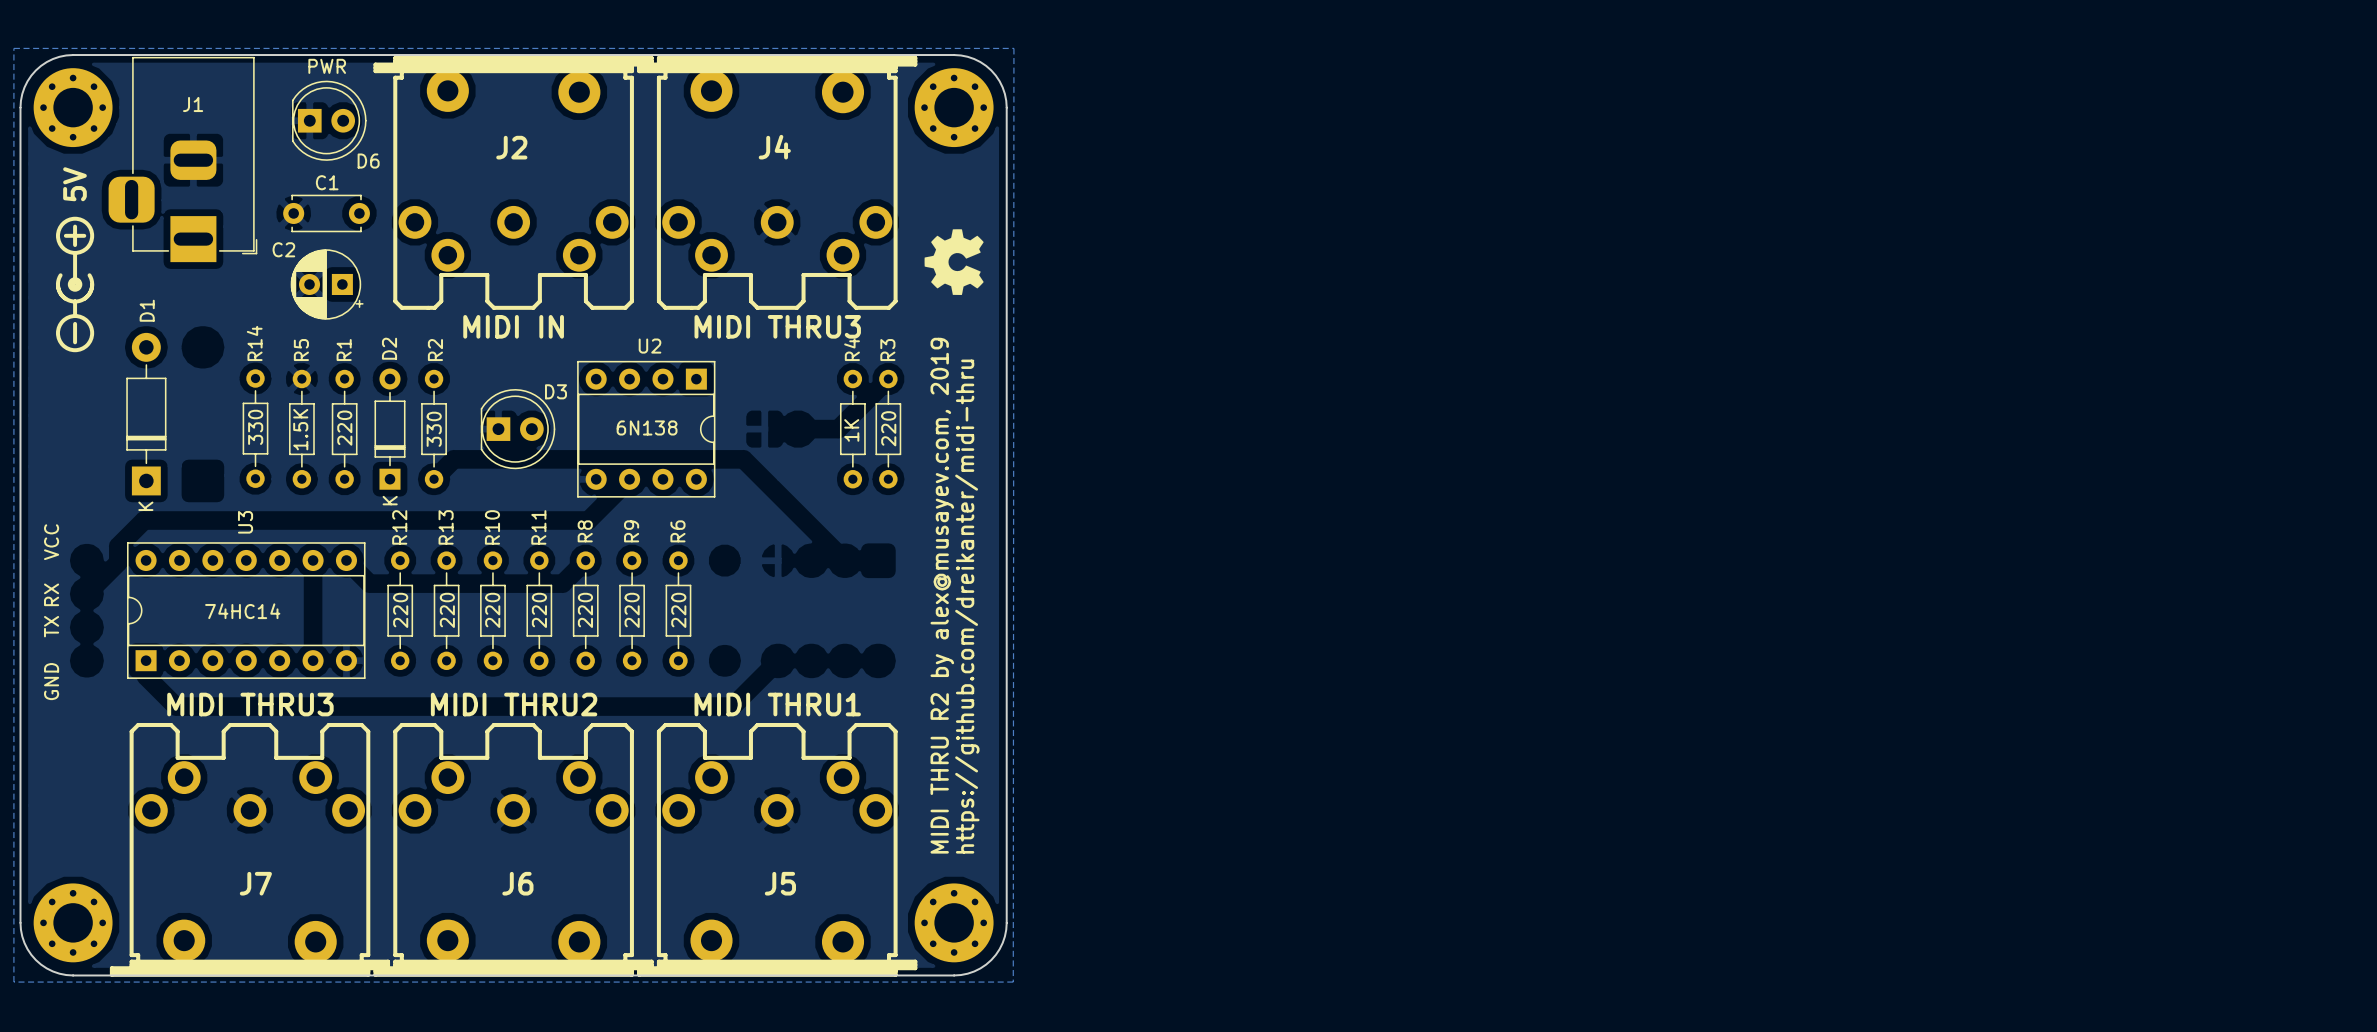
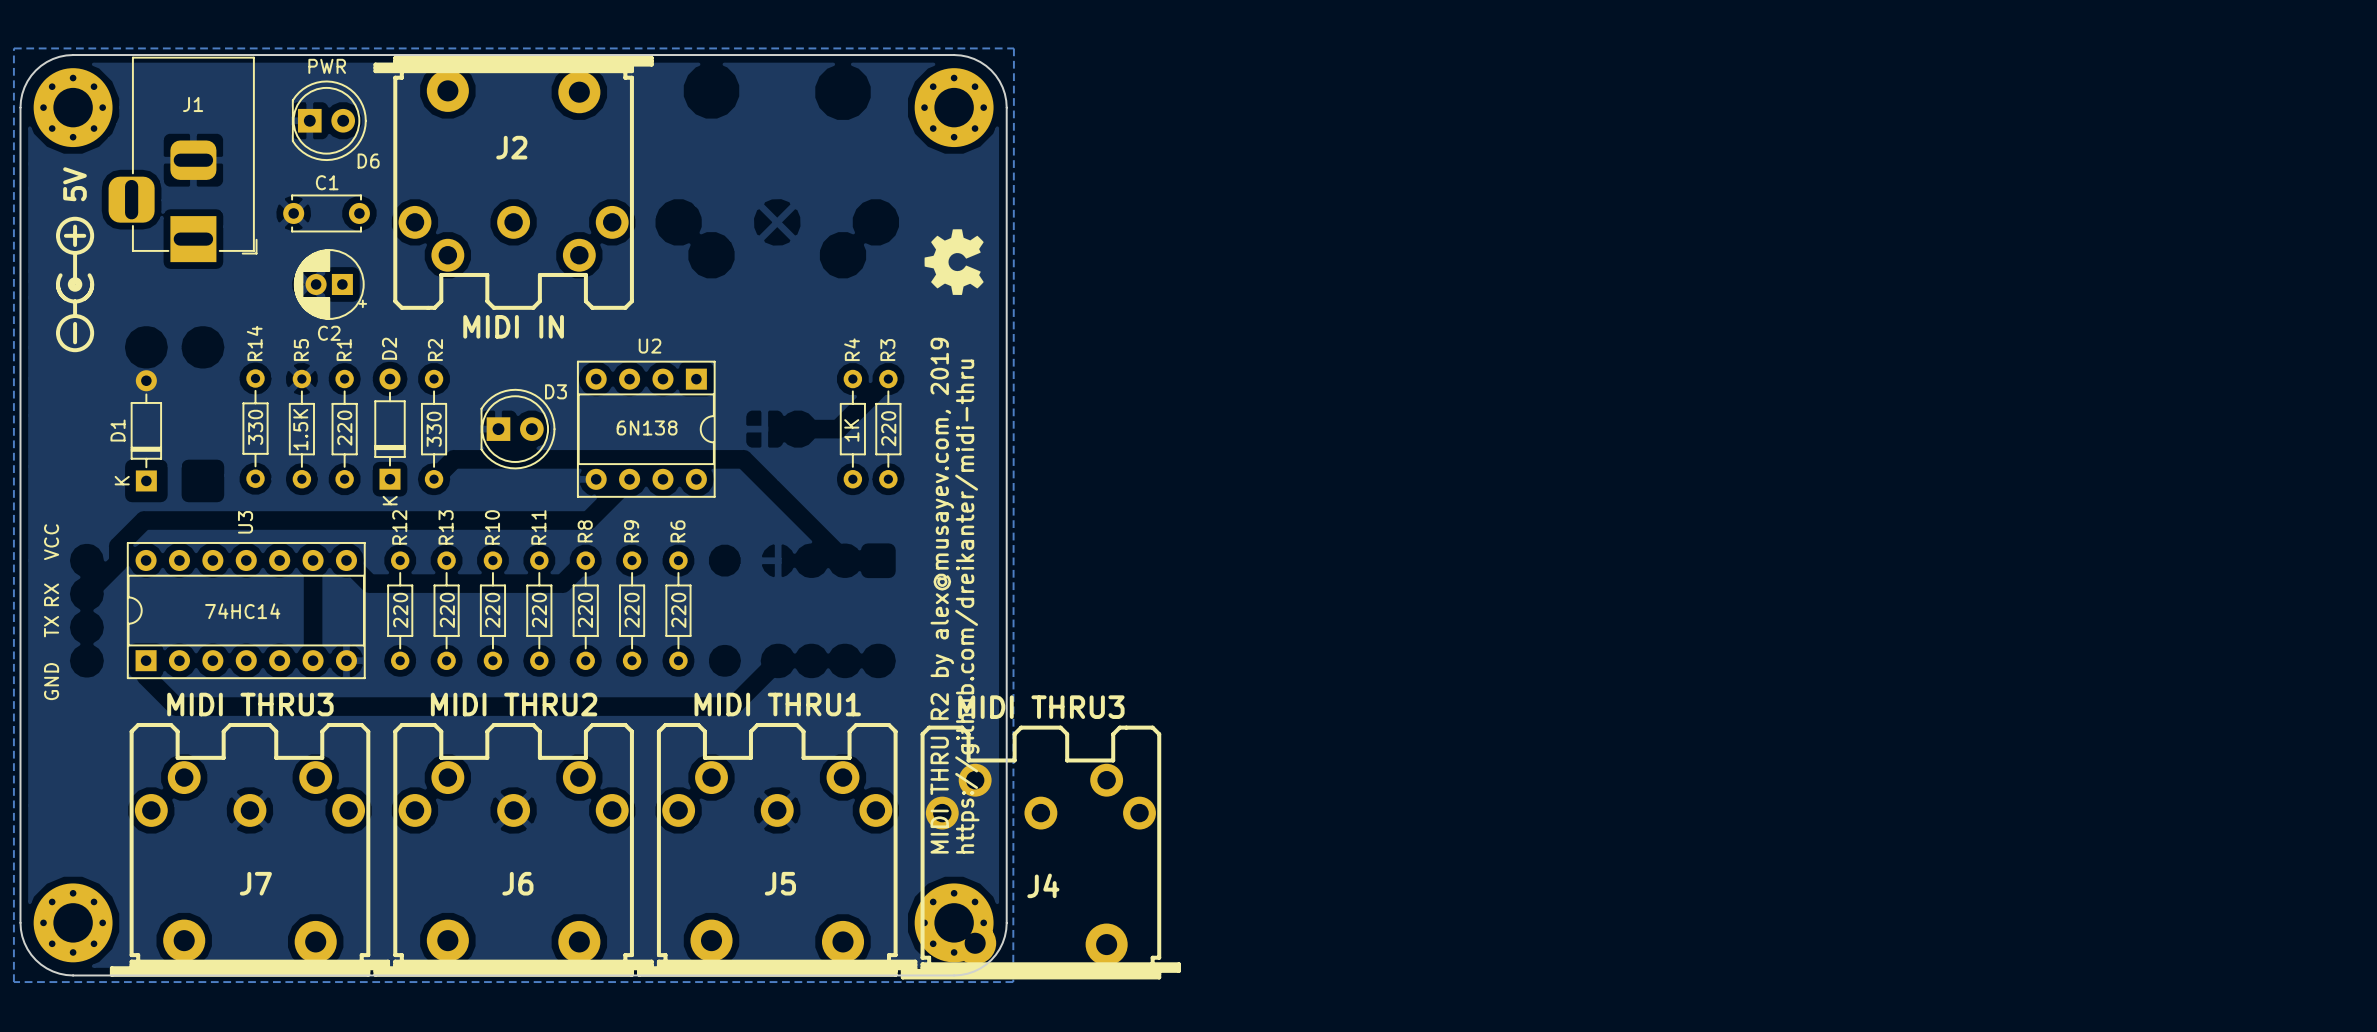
J4 rotation: 0° (777, 182) -> 180° (1040, 852)
J4 position: (777, 182) -> (1040, 852)
C2 name position: C2 (283, 249) -> C2 (329, 333)
C2 footprint: [290, 249, 364, 320] -> [294, 249, 367, 320]
D1 name position: D1 (147, 310) -> D1 (117, 430)
D1 footprint: [126, 332, 167, 496] -> [130, 370, 162, 492]

